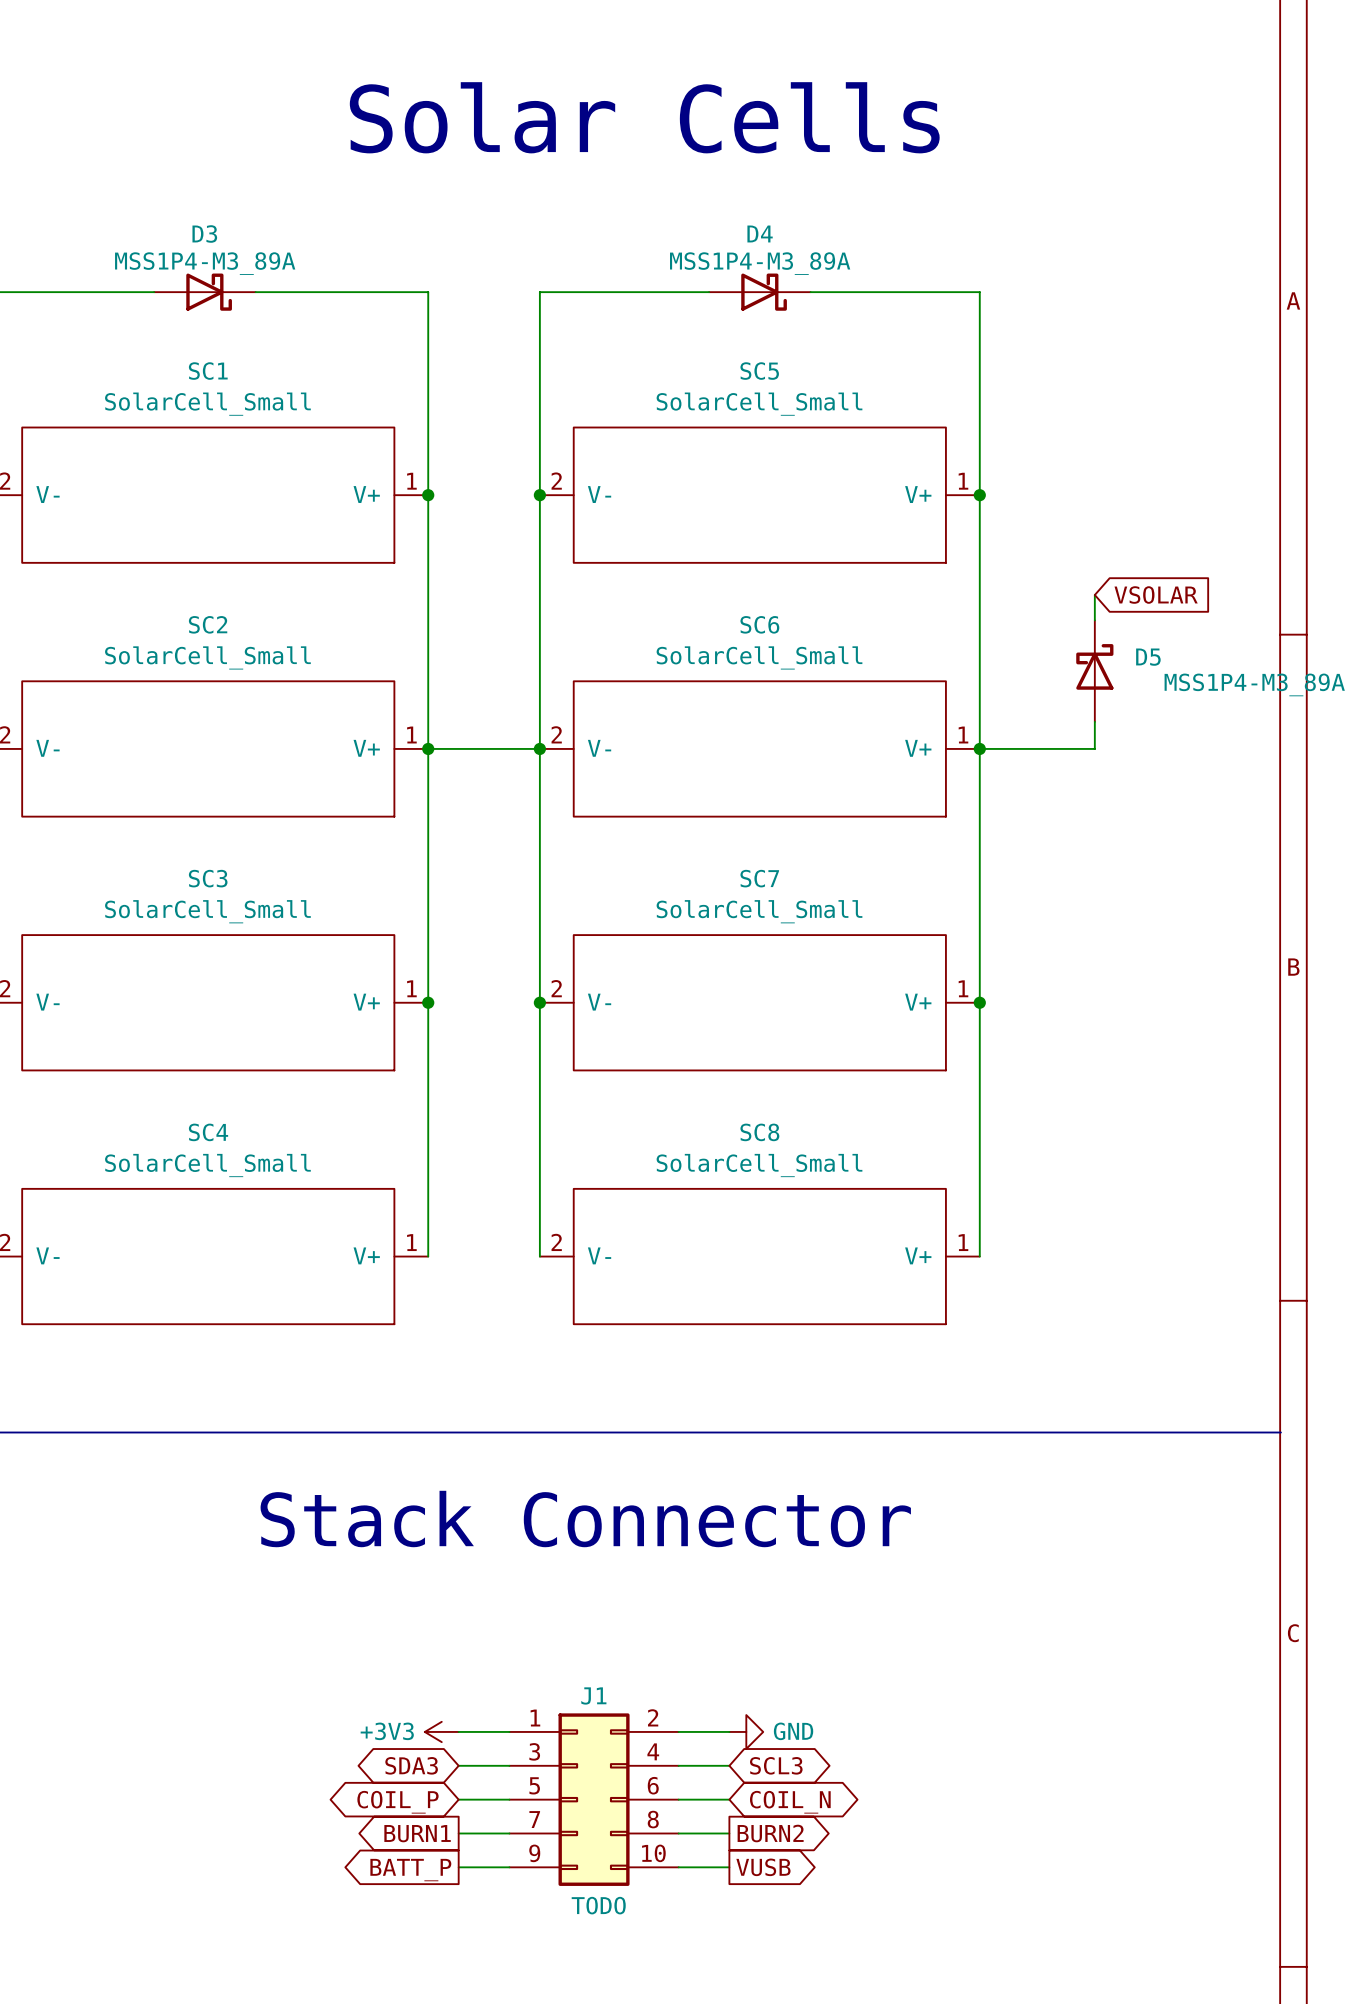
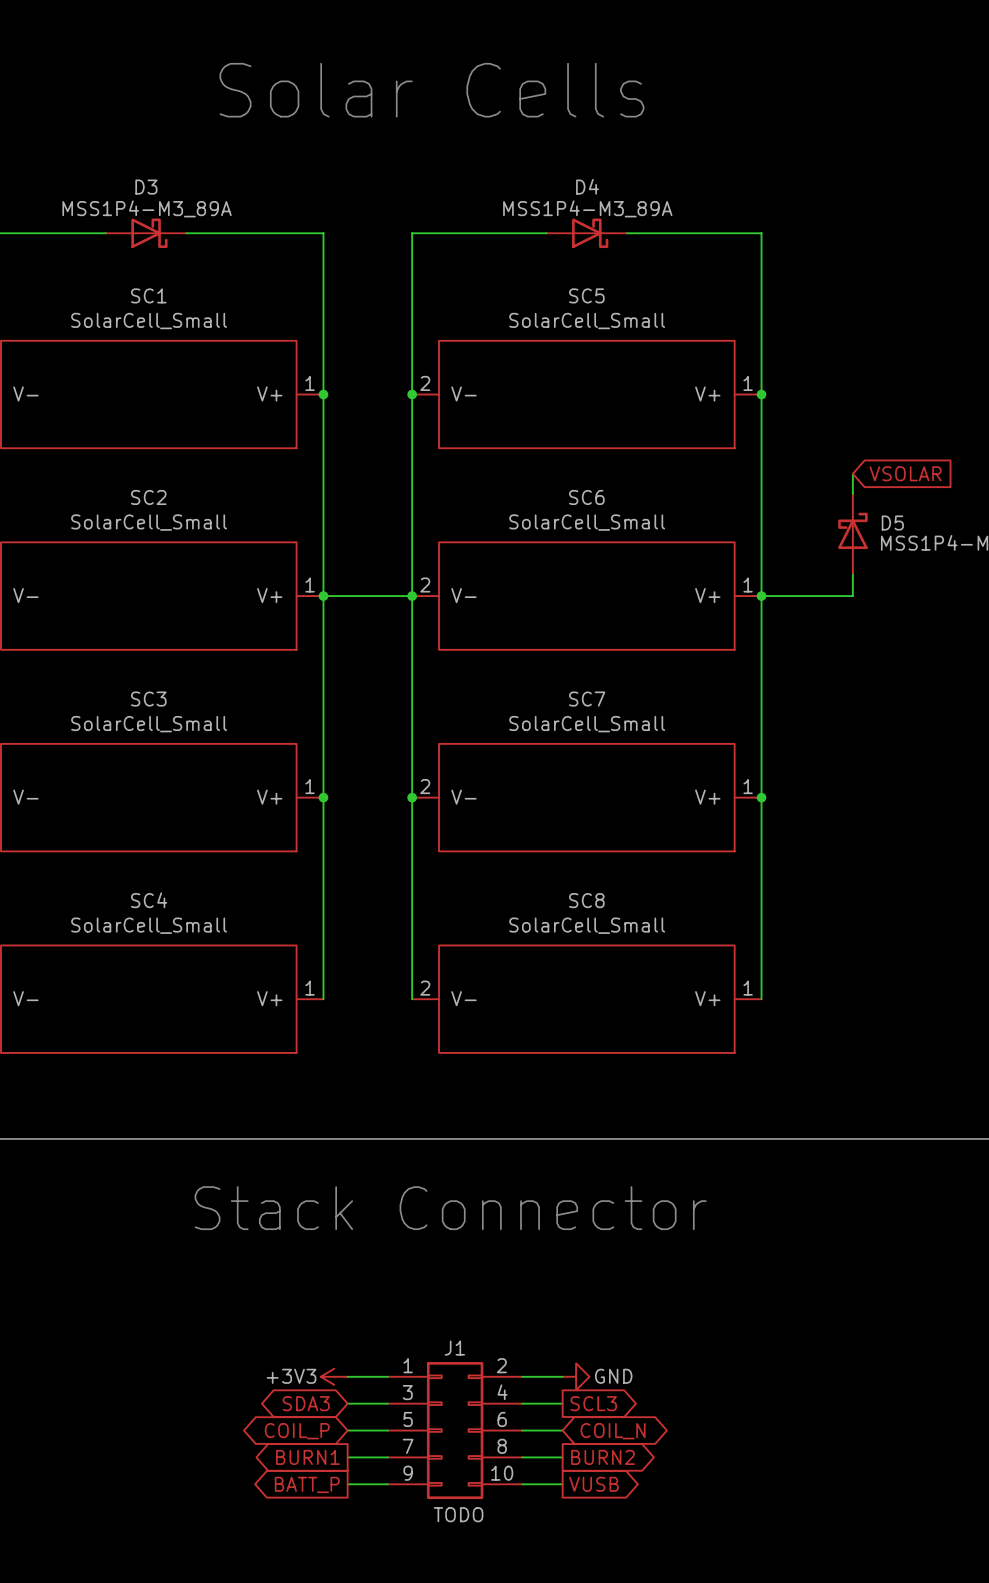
text position: Solar Cells (644, 117) -> Solar Cells (431, 90)
global label shape: bidirectional (776, 1765) -> output (593, 1403)

